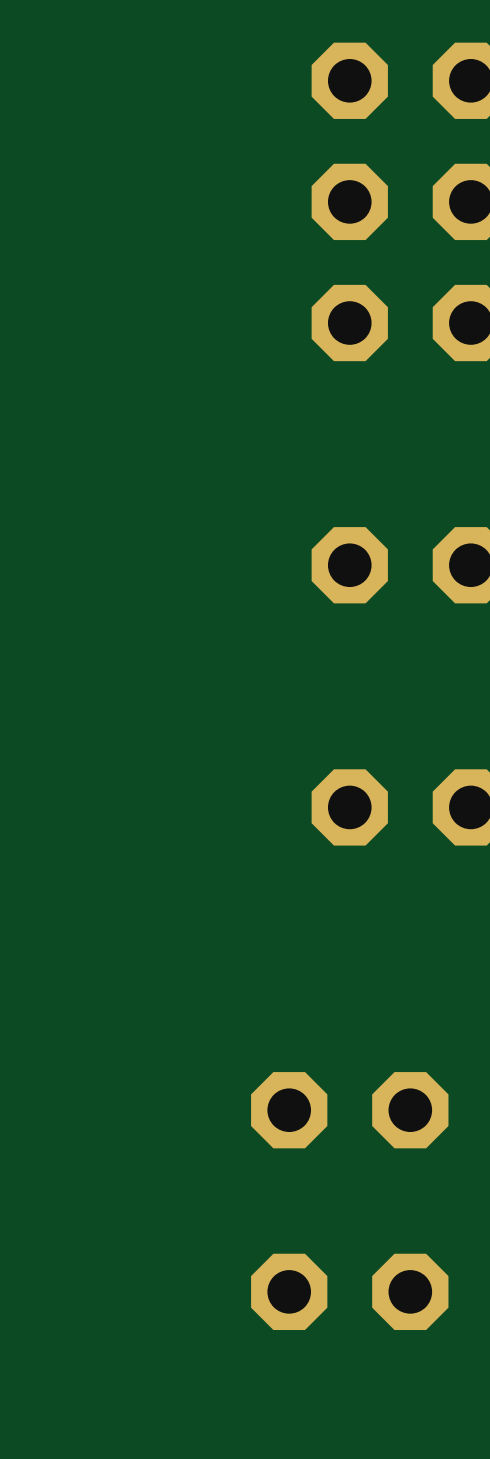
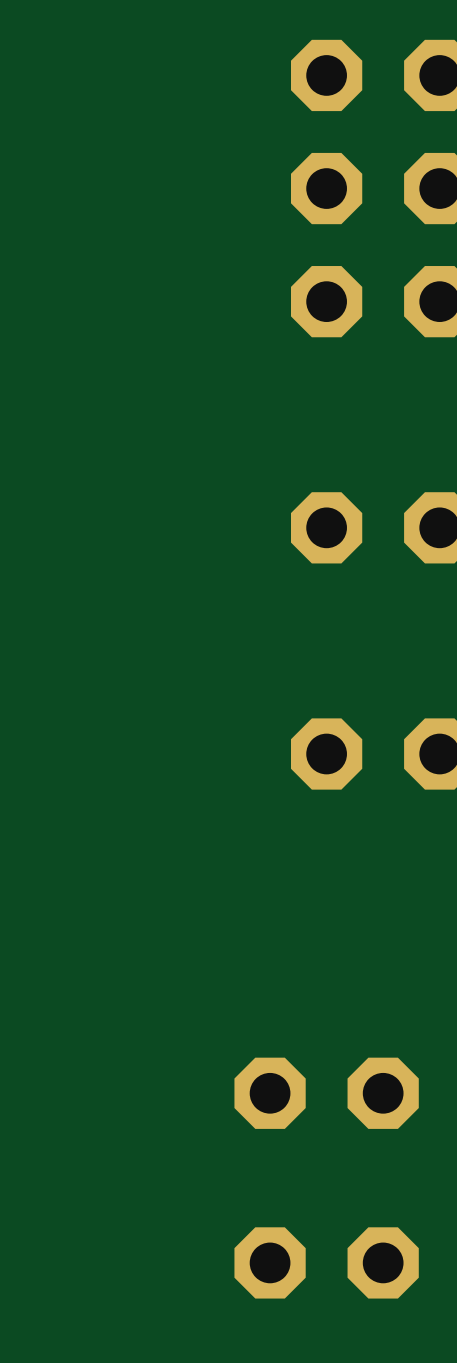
part: (289, 1110) -> none
part: (410, 1110) -> none
part: none -> (270, 1093)
part: none -> (383, 1093)
part: (289, 1291) -> none
part: (410, 1291) -> none
part: none -> (270, 1262)
part: none -> (383, 1262)

